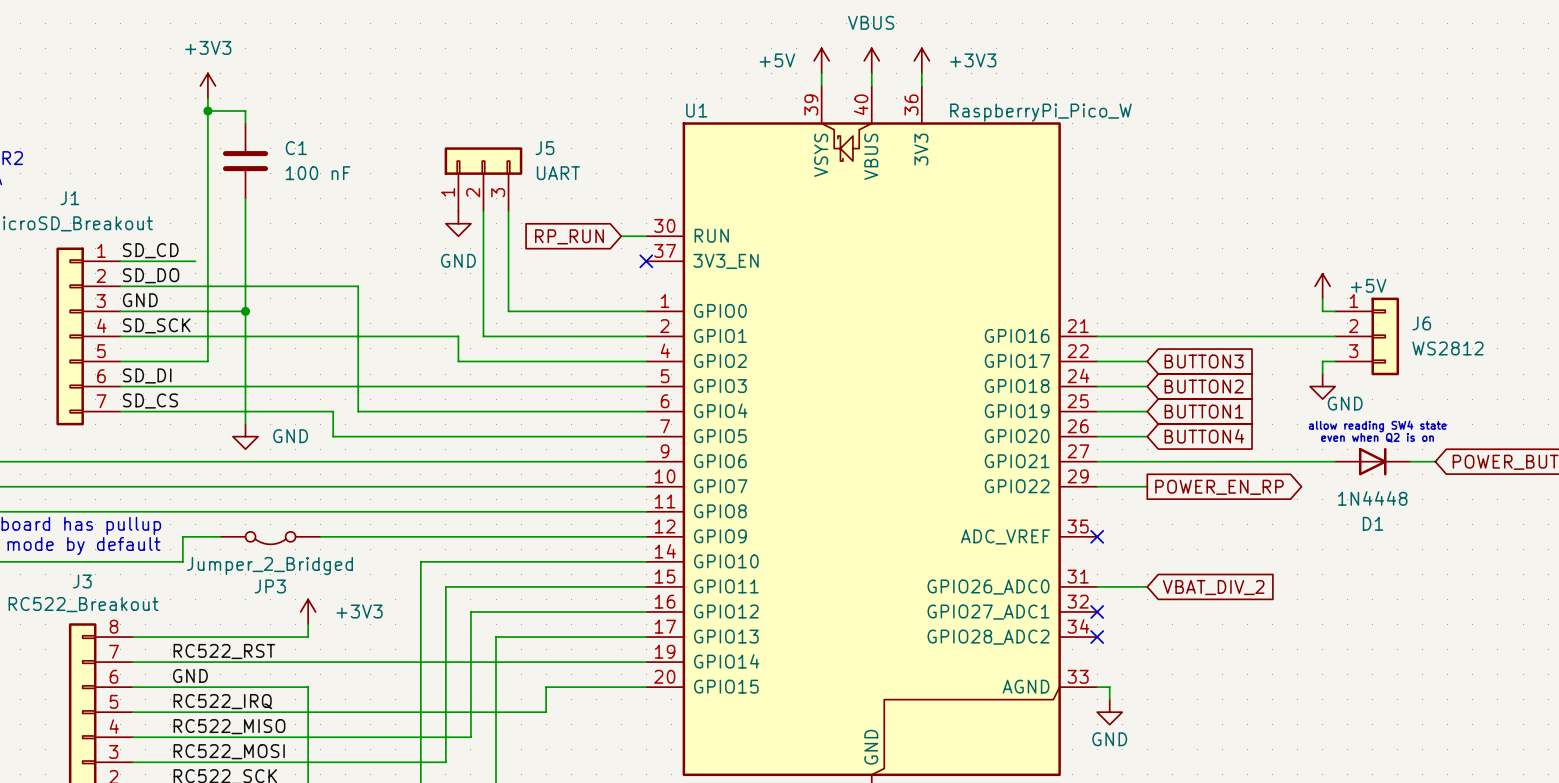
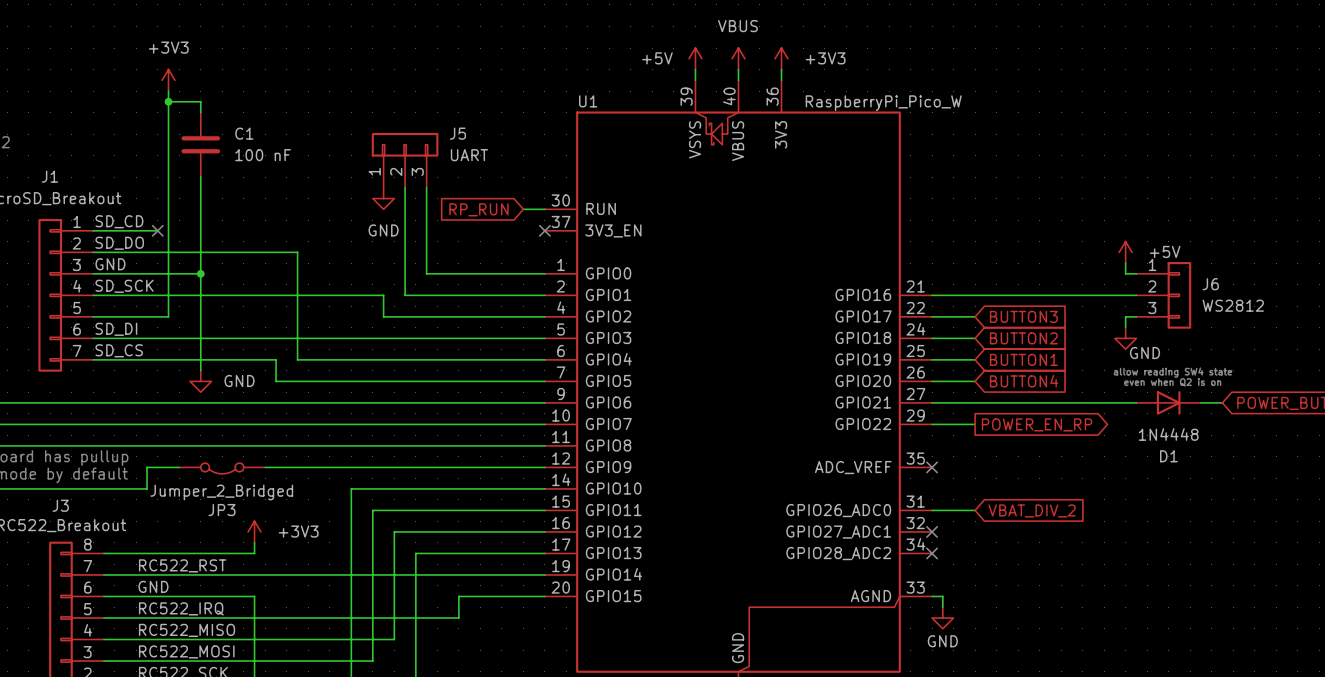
no-connect mark: none -> (157, 230)

